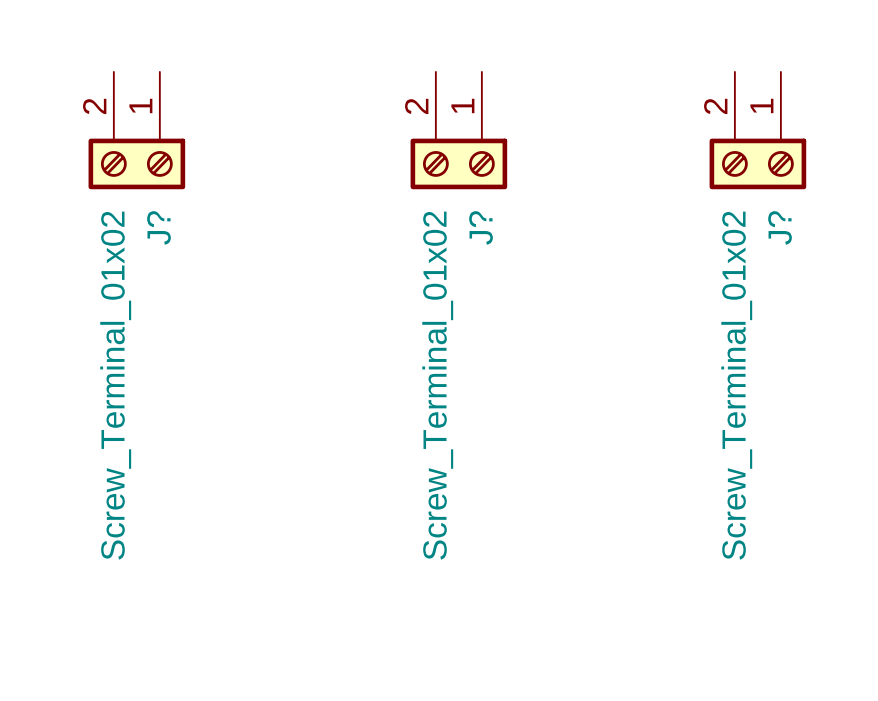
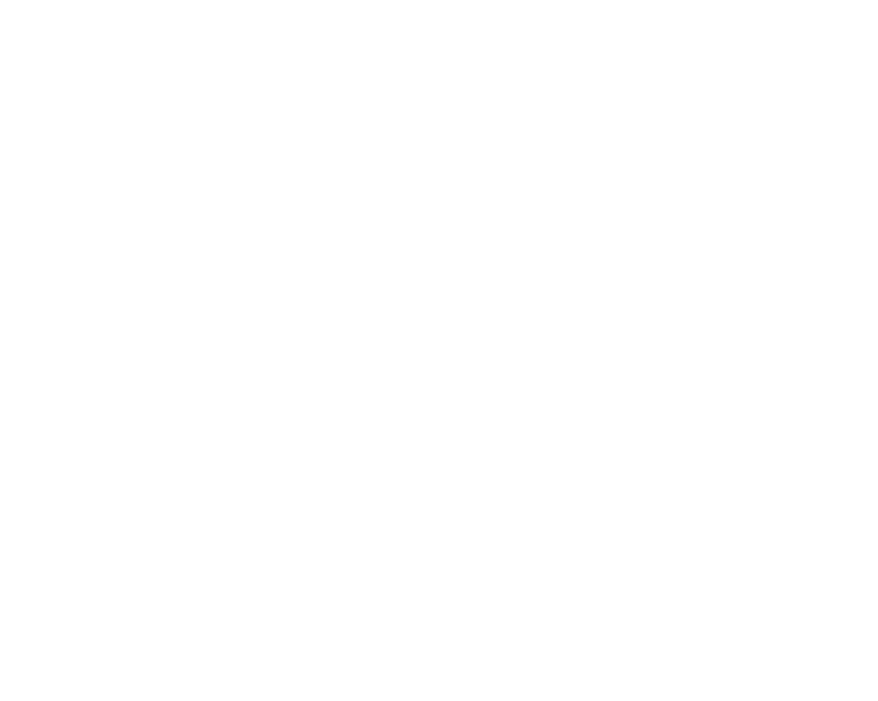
J?: Screw_Terminal_01x02 (136, 130) -> none
J?: Screw_Terminal_01x02 (458, 130) -> none
J?: Screw_Terminal_01x02 (757, 130) -> none

